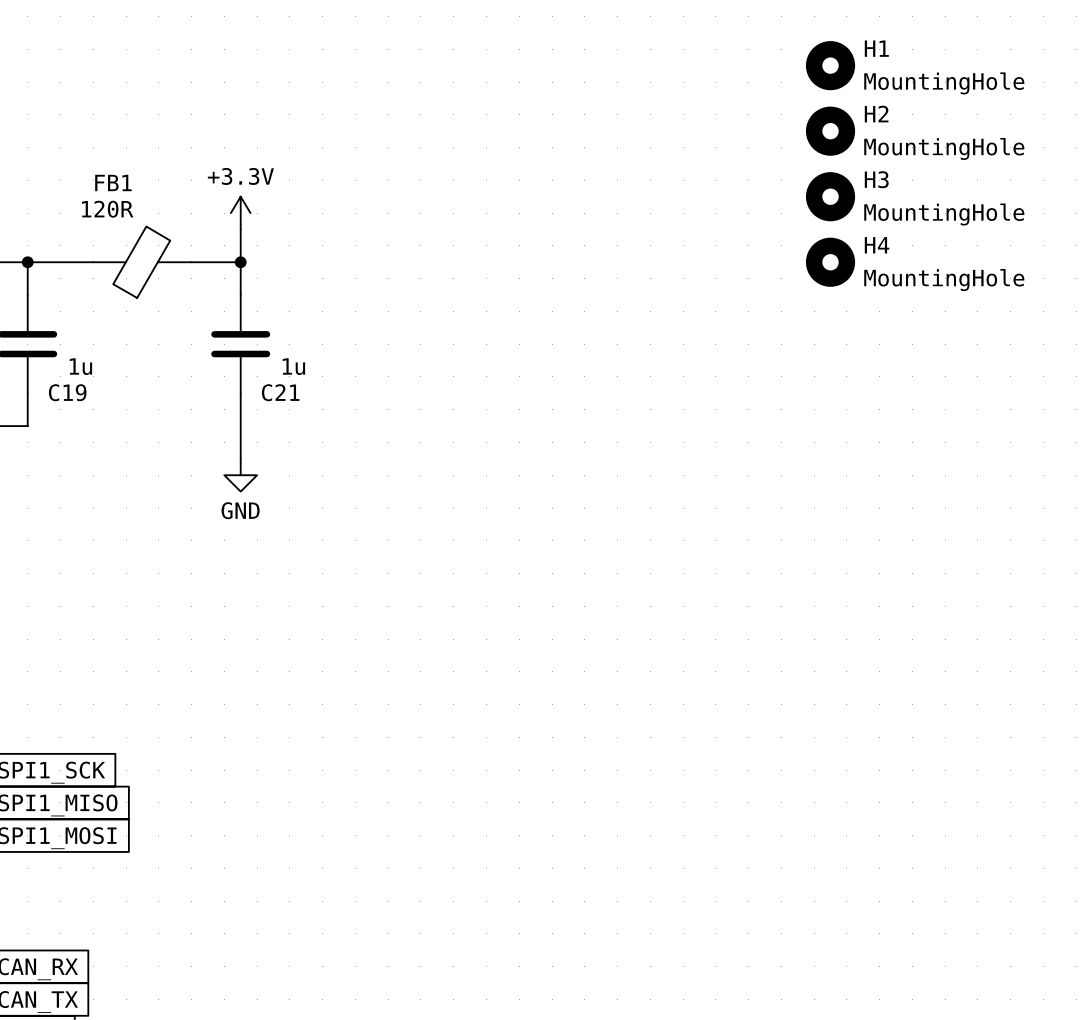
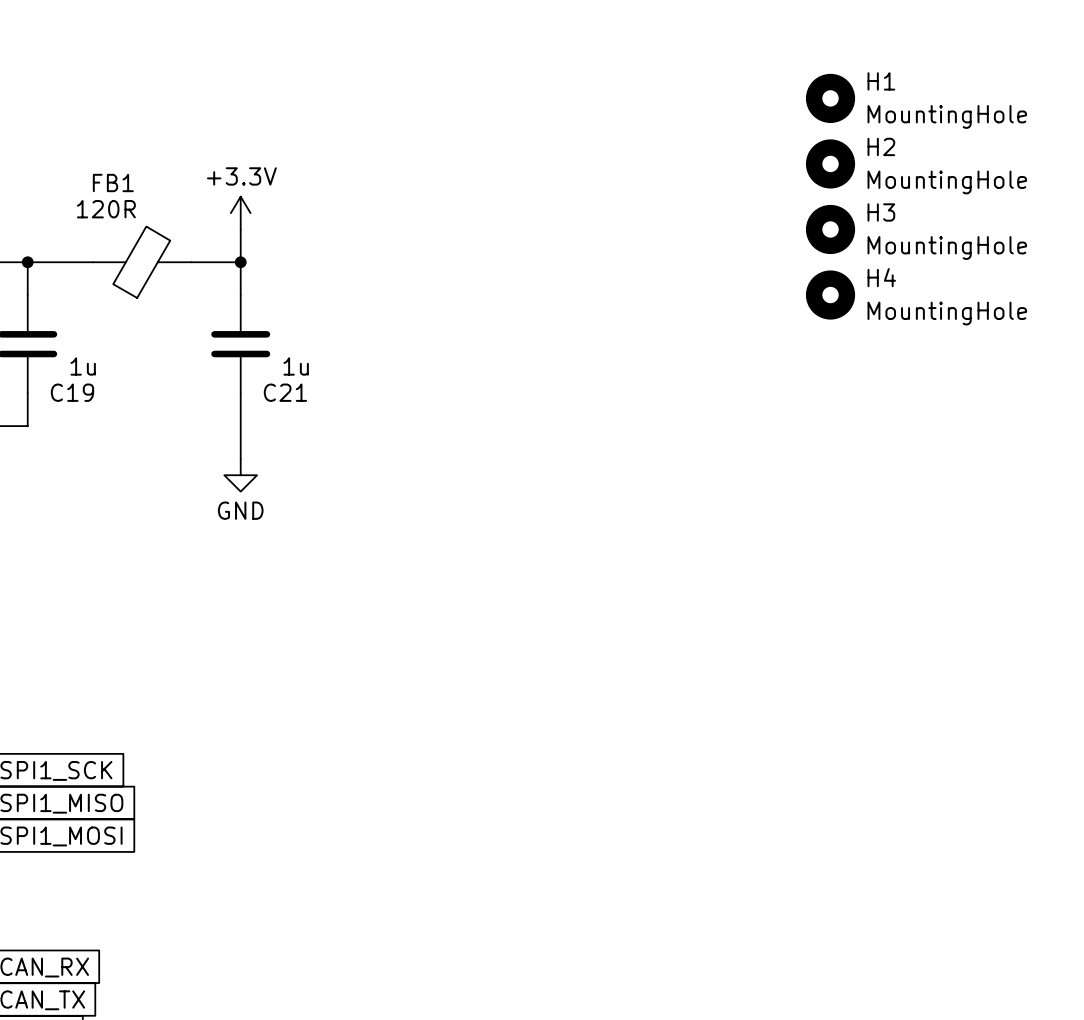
H1 position: (830, 65) -> (830, 98)
H2 position: (830, 131) -> (830, 163)
H3 position: (830, 196) -> (830, 229)
H4 position: (830, 262) -> (830, 295)

